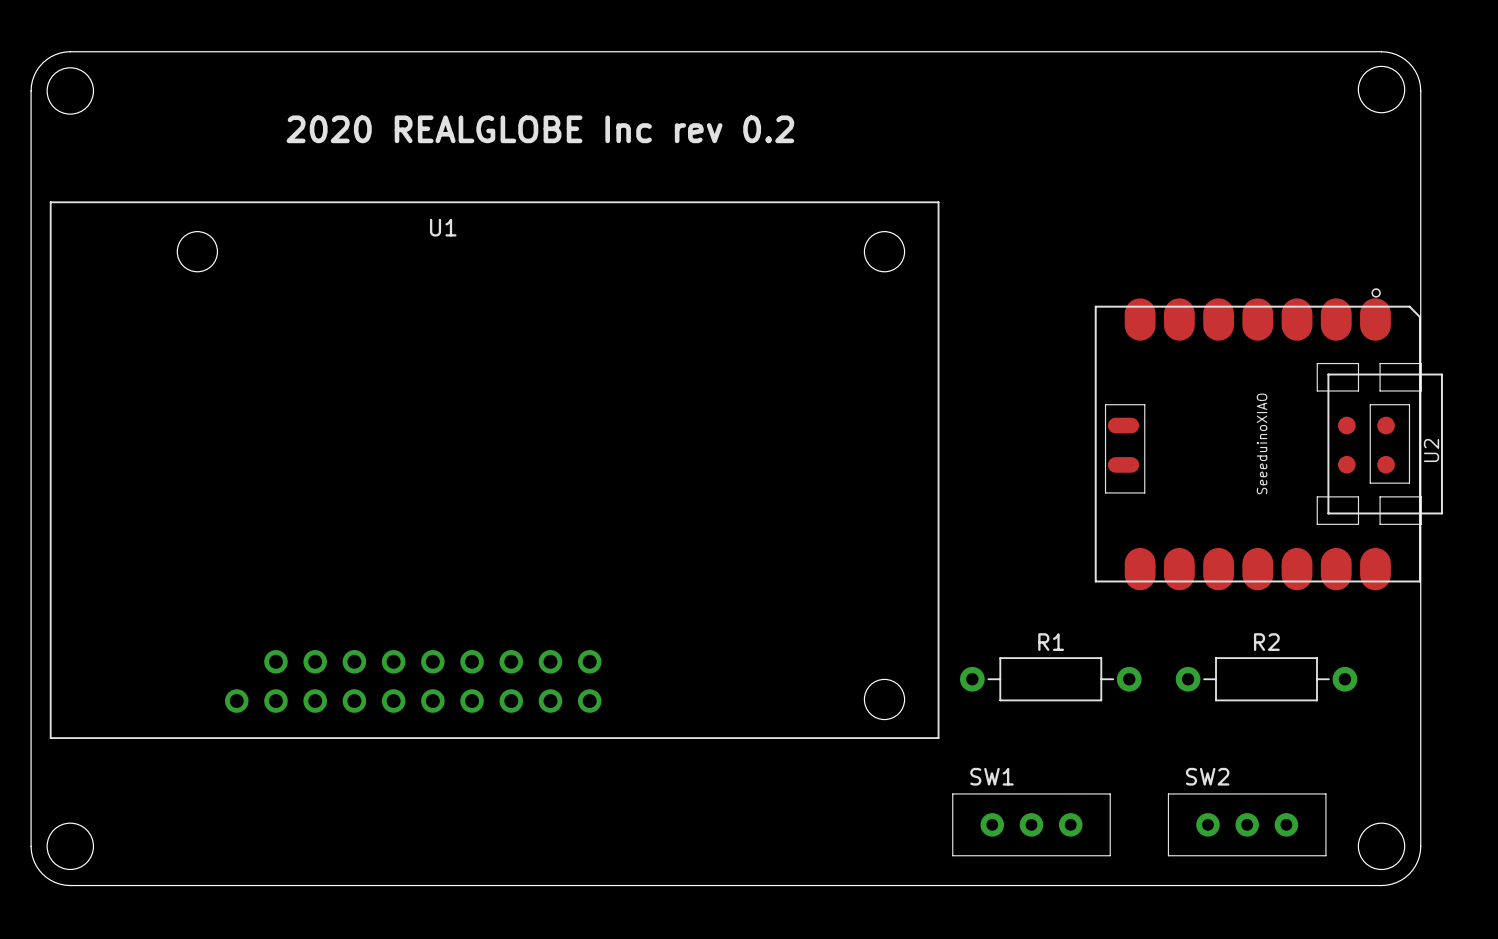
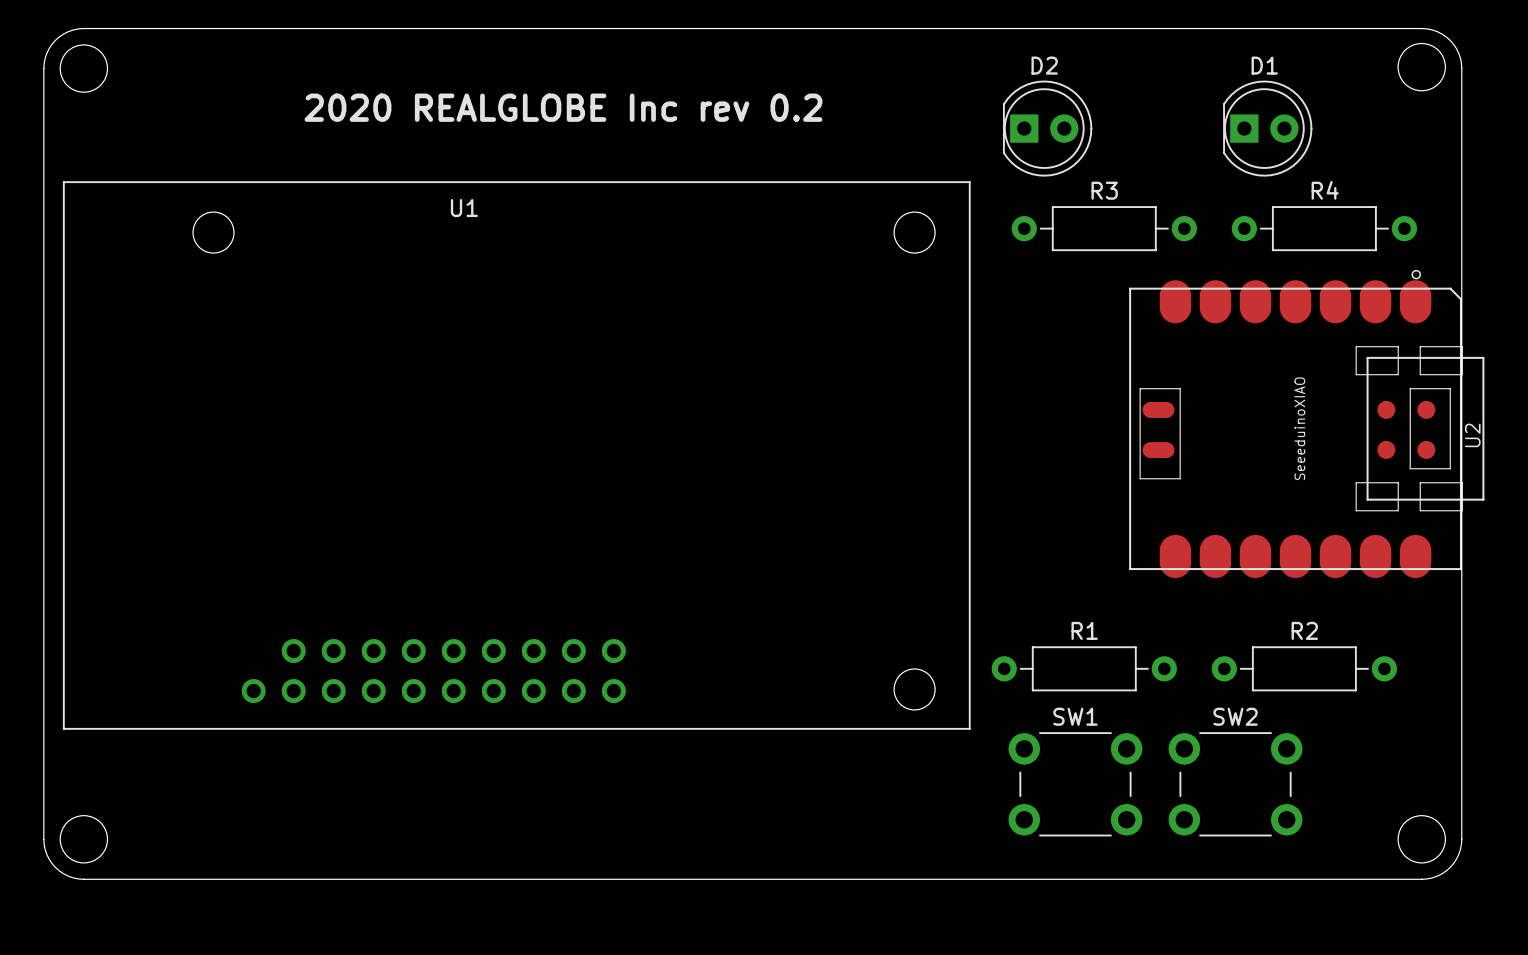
D2: none -> (1047, 128)
D1: none -> (1267, 128)
R3: none -> (1104, 228)
R4: none -> (1324, 228)
SW1 name position: SW1 (991, 776) -> SW1 (1075, 716)
SW2 name position: SW2 (1207, 776) -> SW2 (1235, 716)
SW1 footprint: [952, 793, 1111, 857] -> [1008, 732, 1143, 837]
SW2 footprint: [1168, 793, 1327, 857] -> [1168, 732, 1303, 837]

